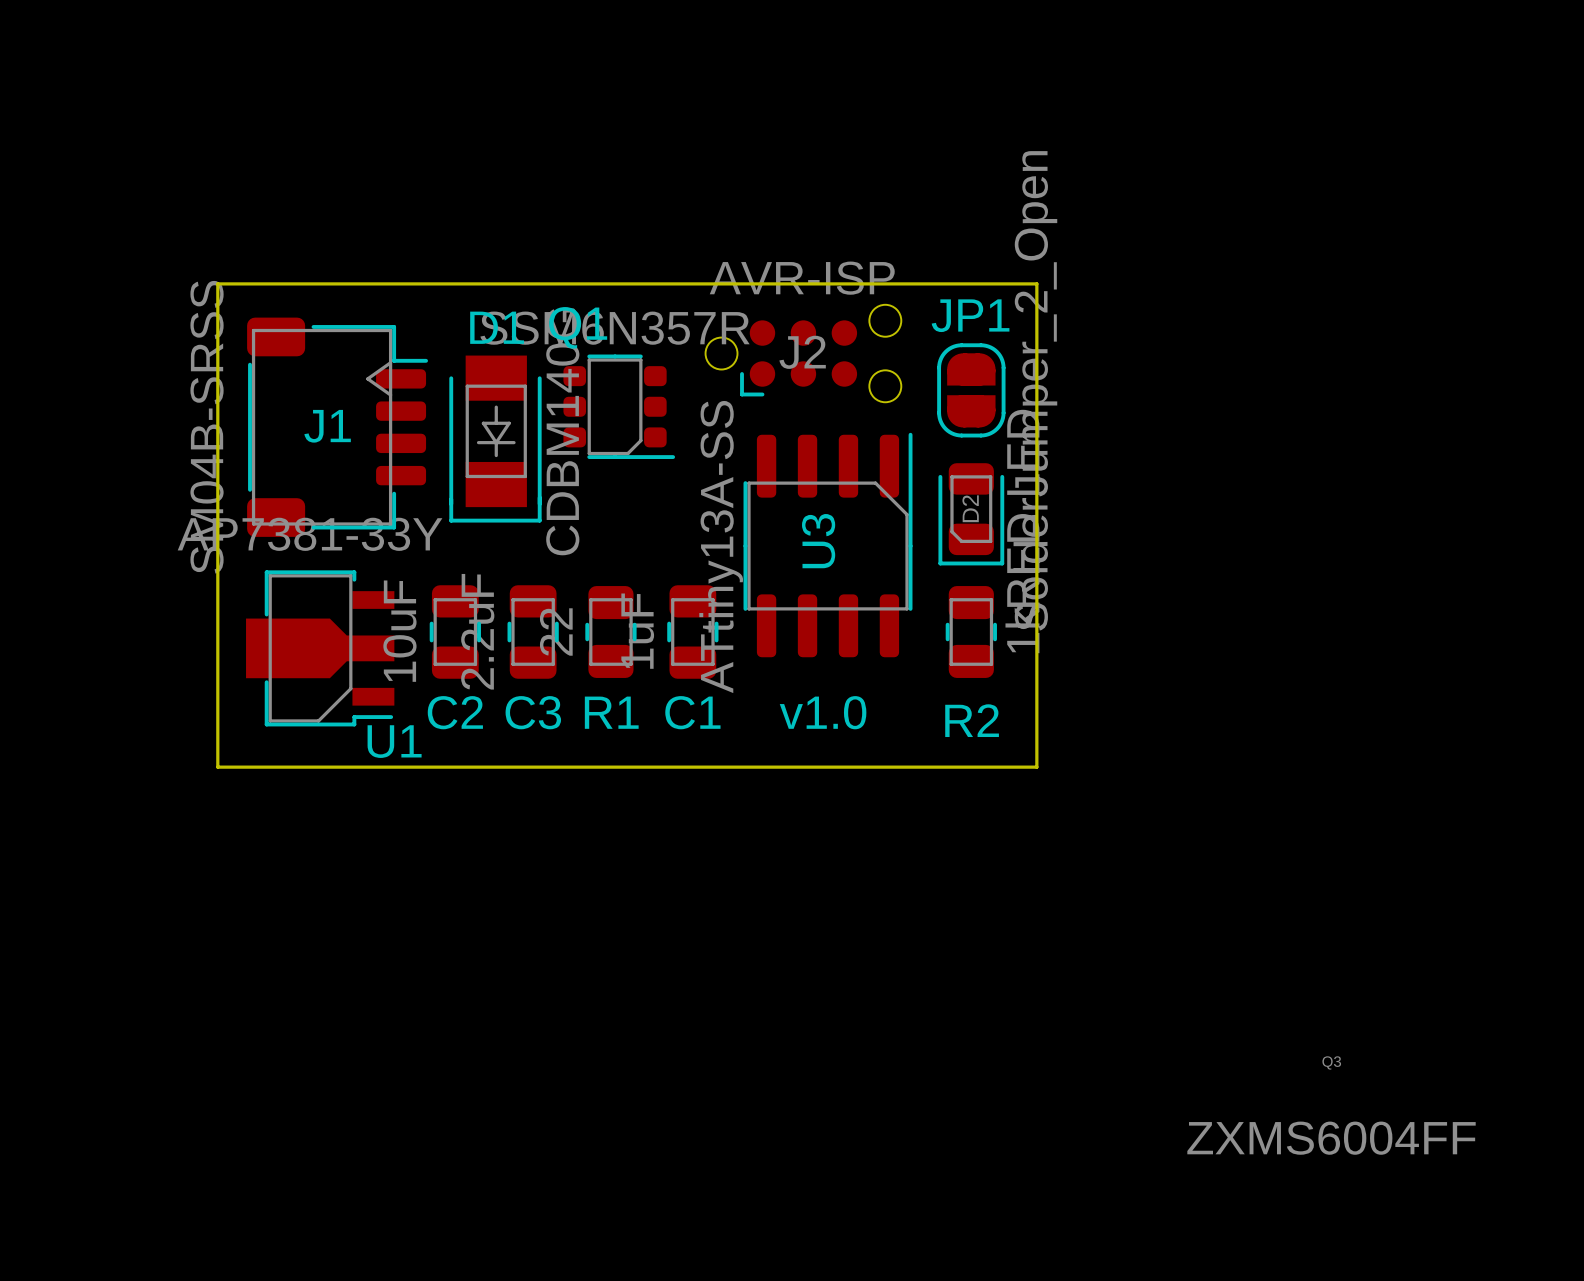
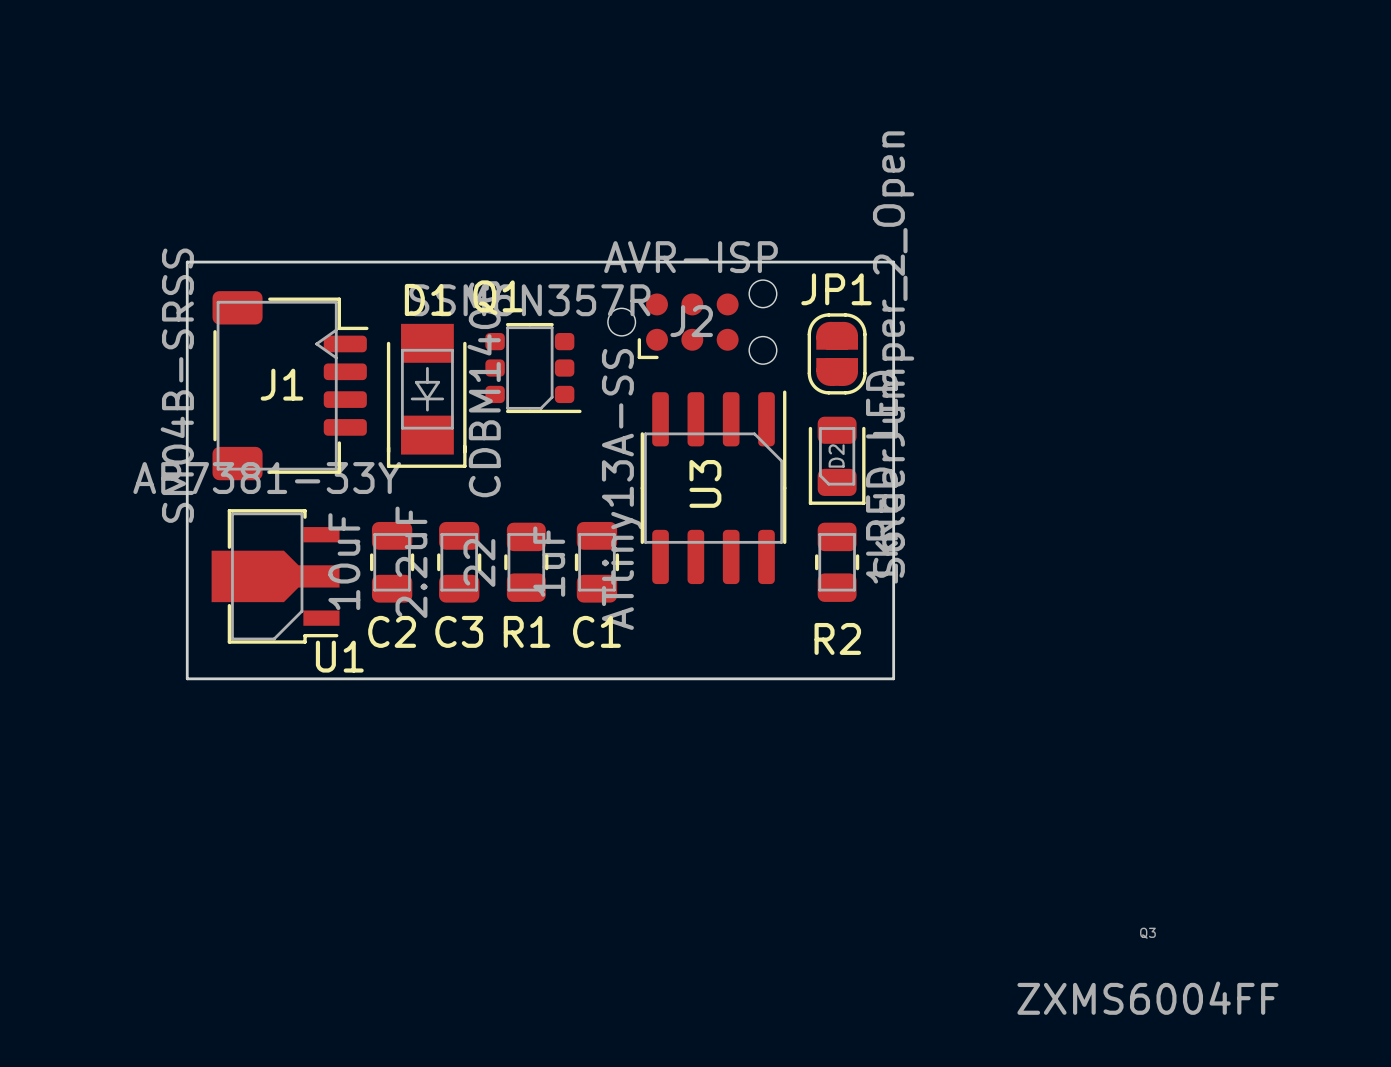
text: v1.0 (823, 712) -> none

